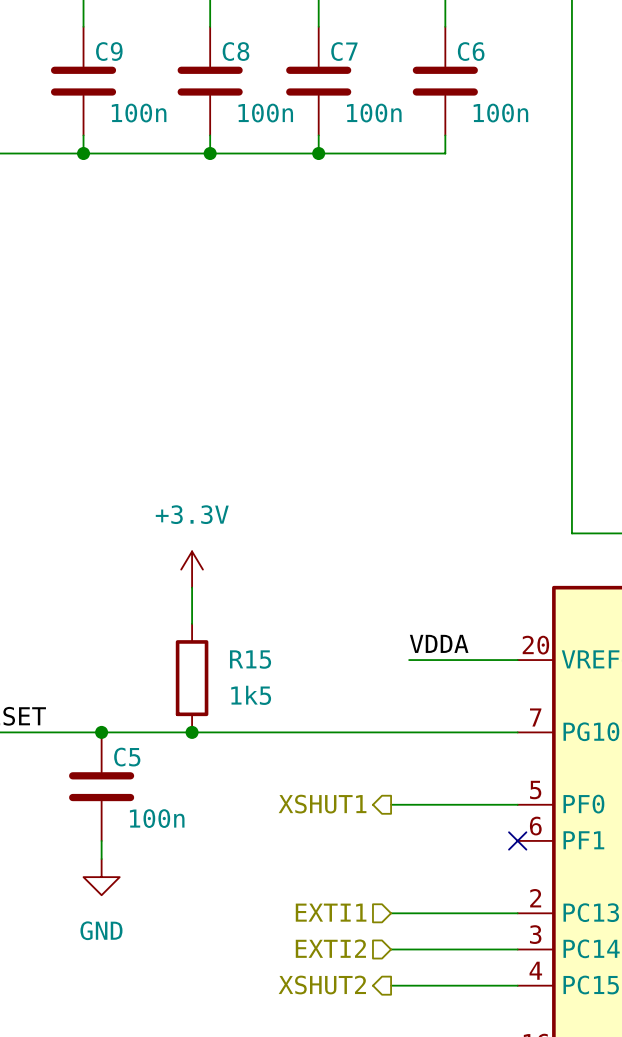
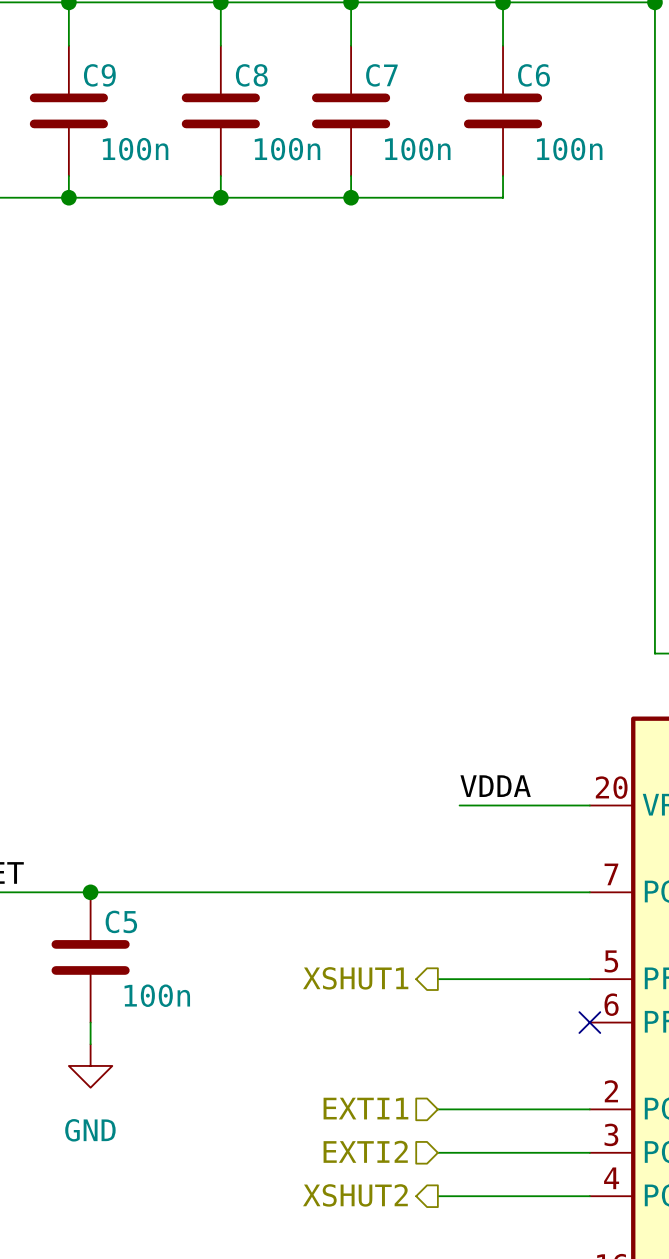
power symbol: +3.3V (192, 569) -> none
wire: (192, 587) (192, 623) -> none
R15: 1k5 (192, 678) -> none
junction: (192, 732) -> none

